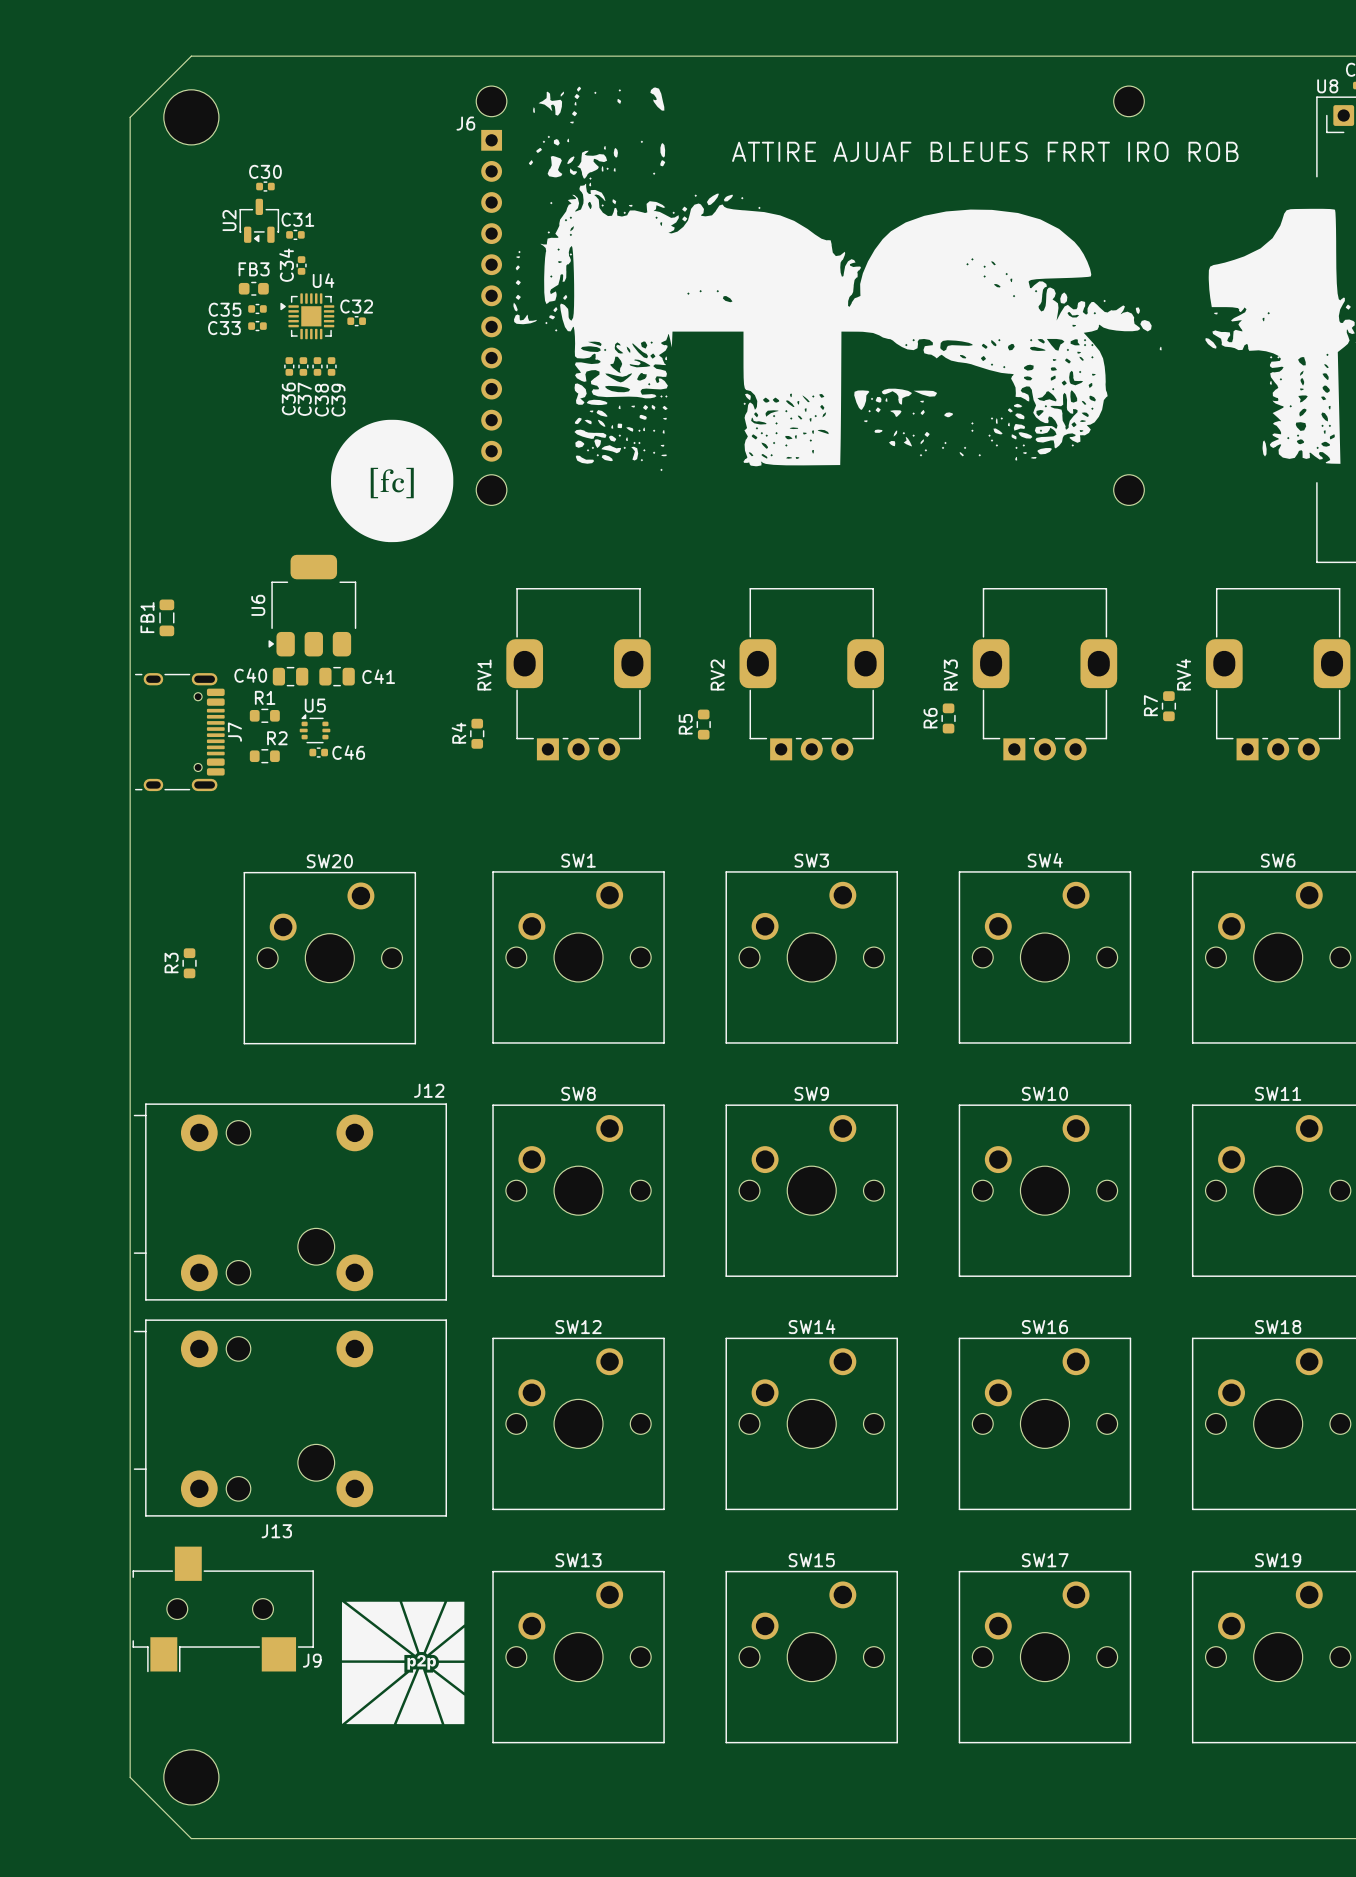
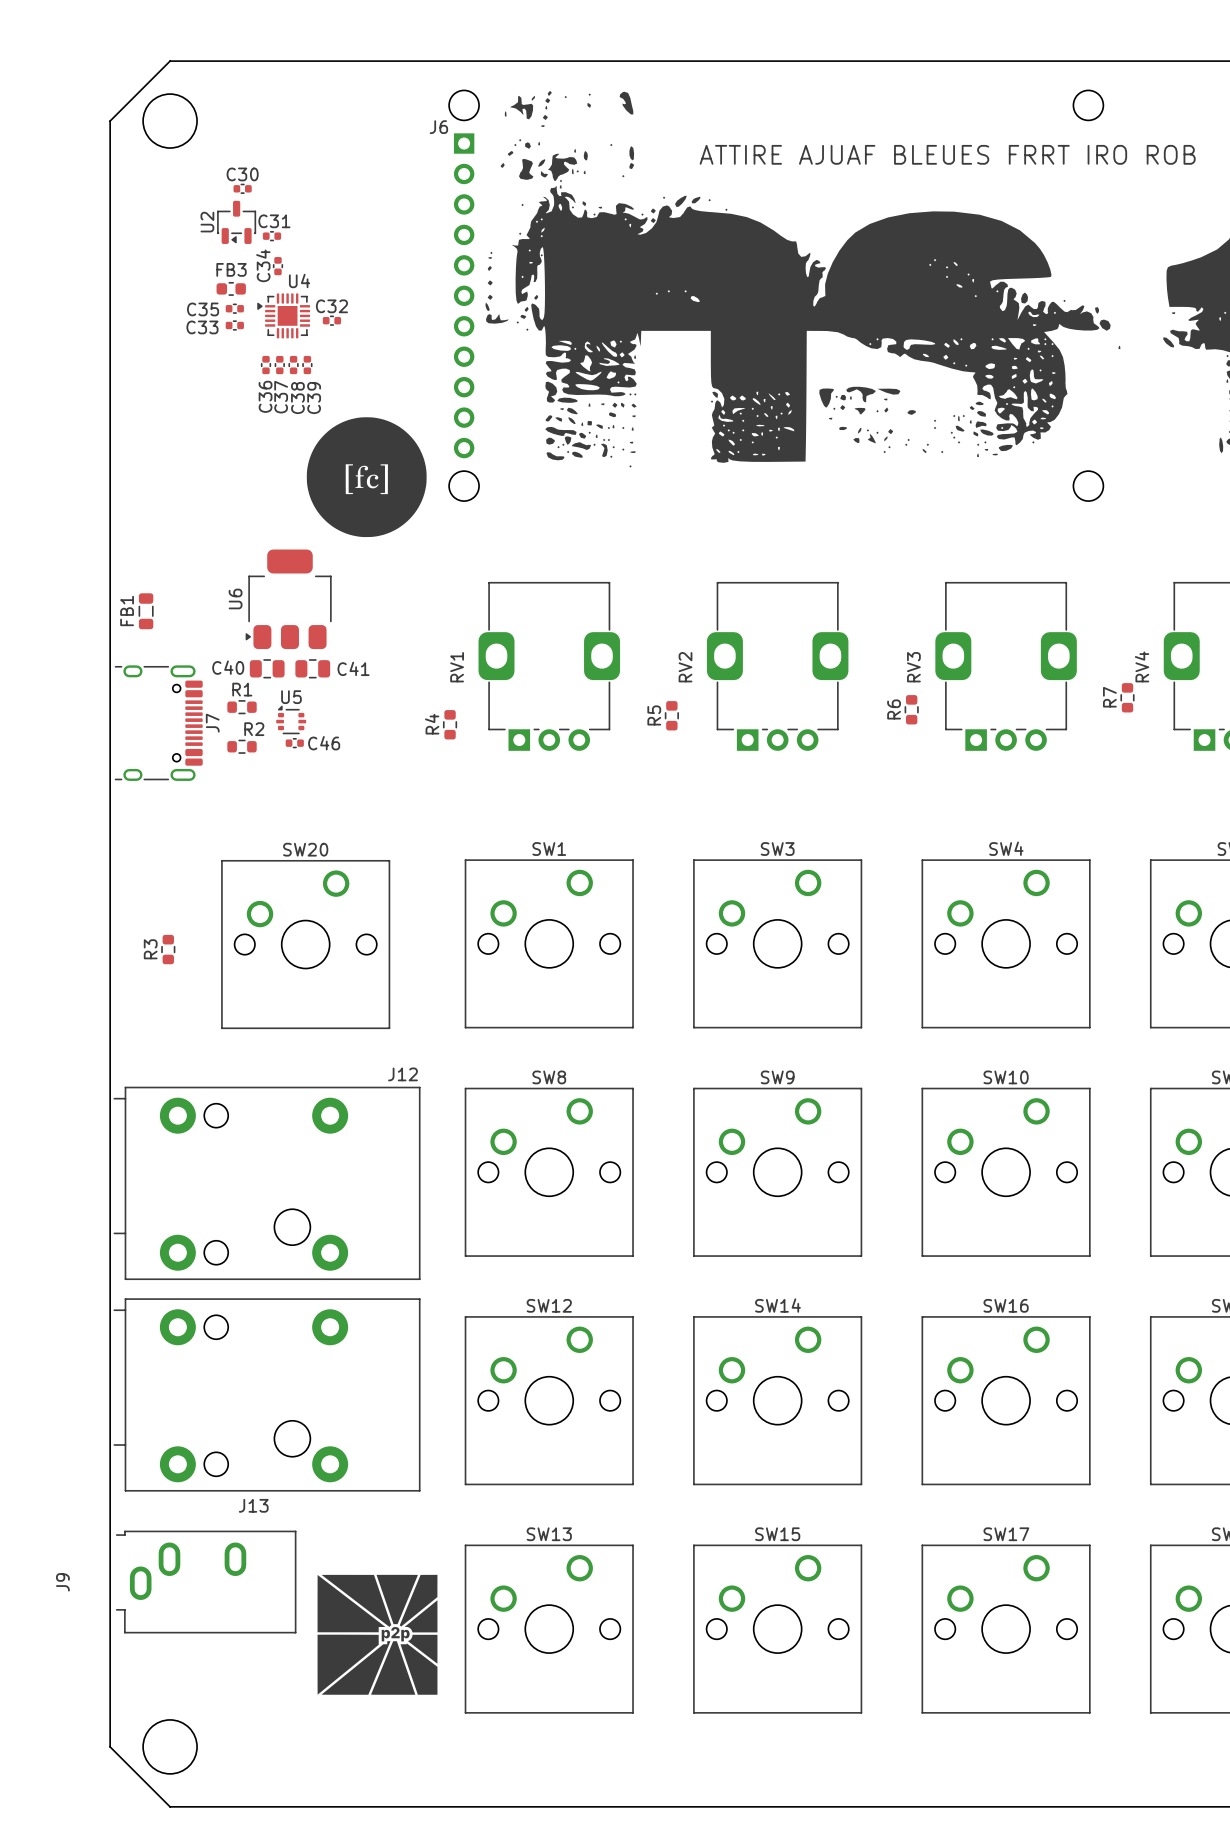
J9 footprint: [132, 1546, 314, 1673] -> [116, 1530, 297, 1634]
J9 name position: J9 (312, 1660) -> J9 (62, 1582)

